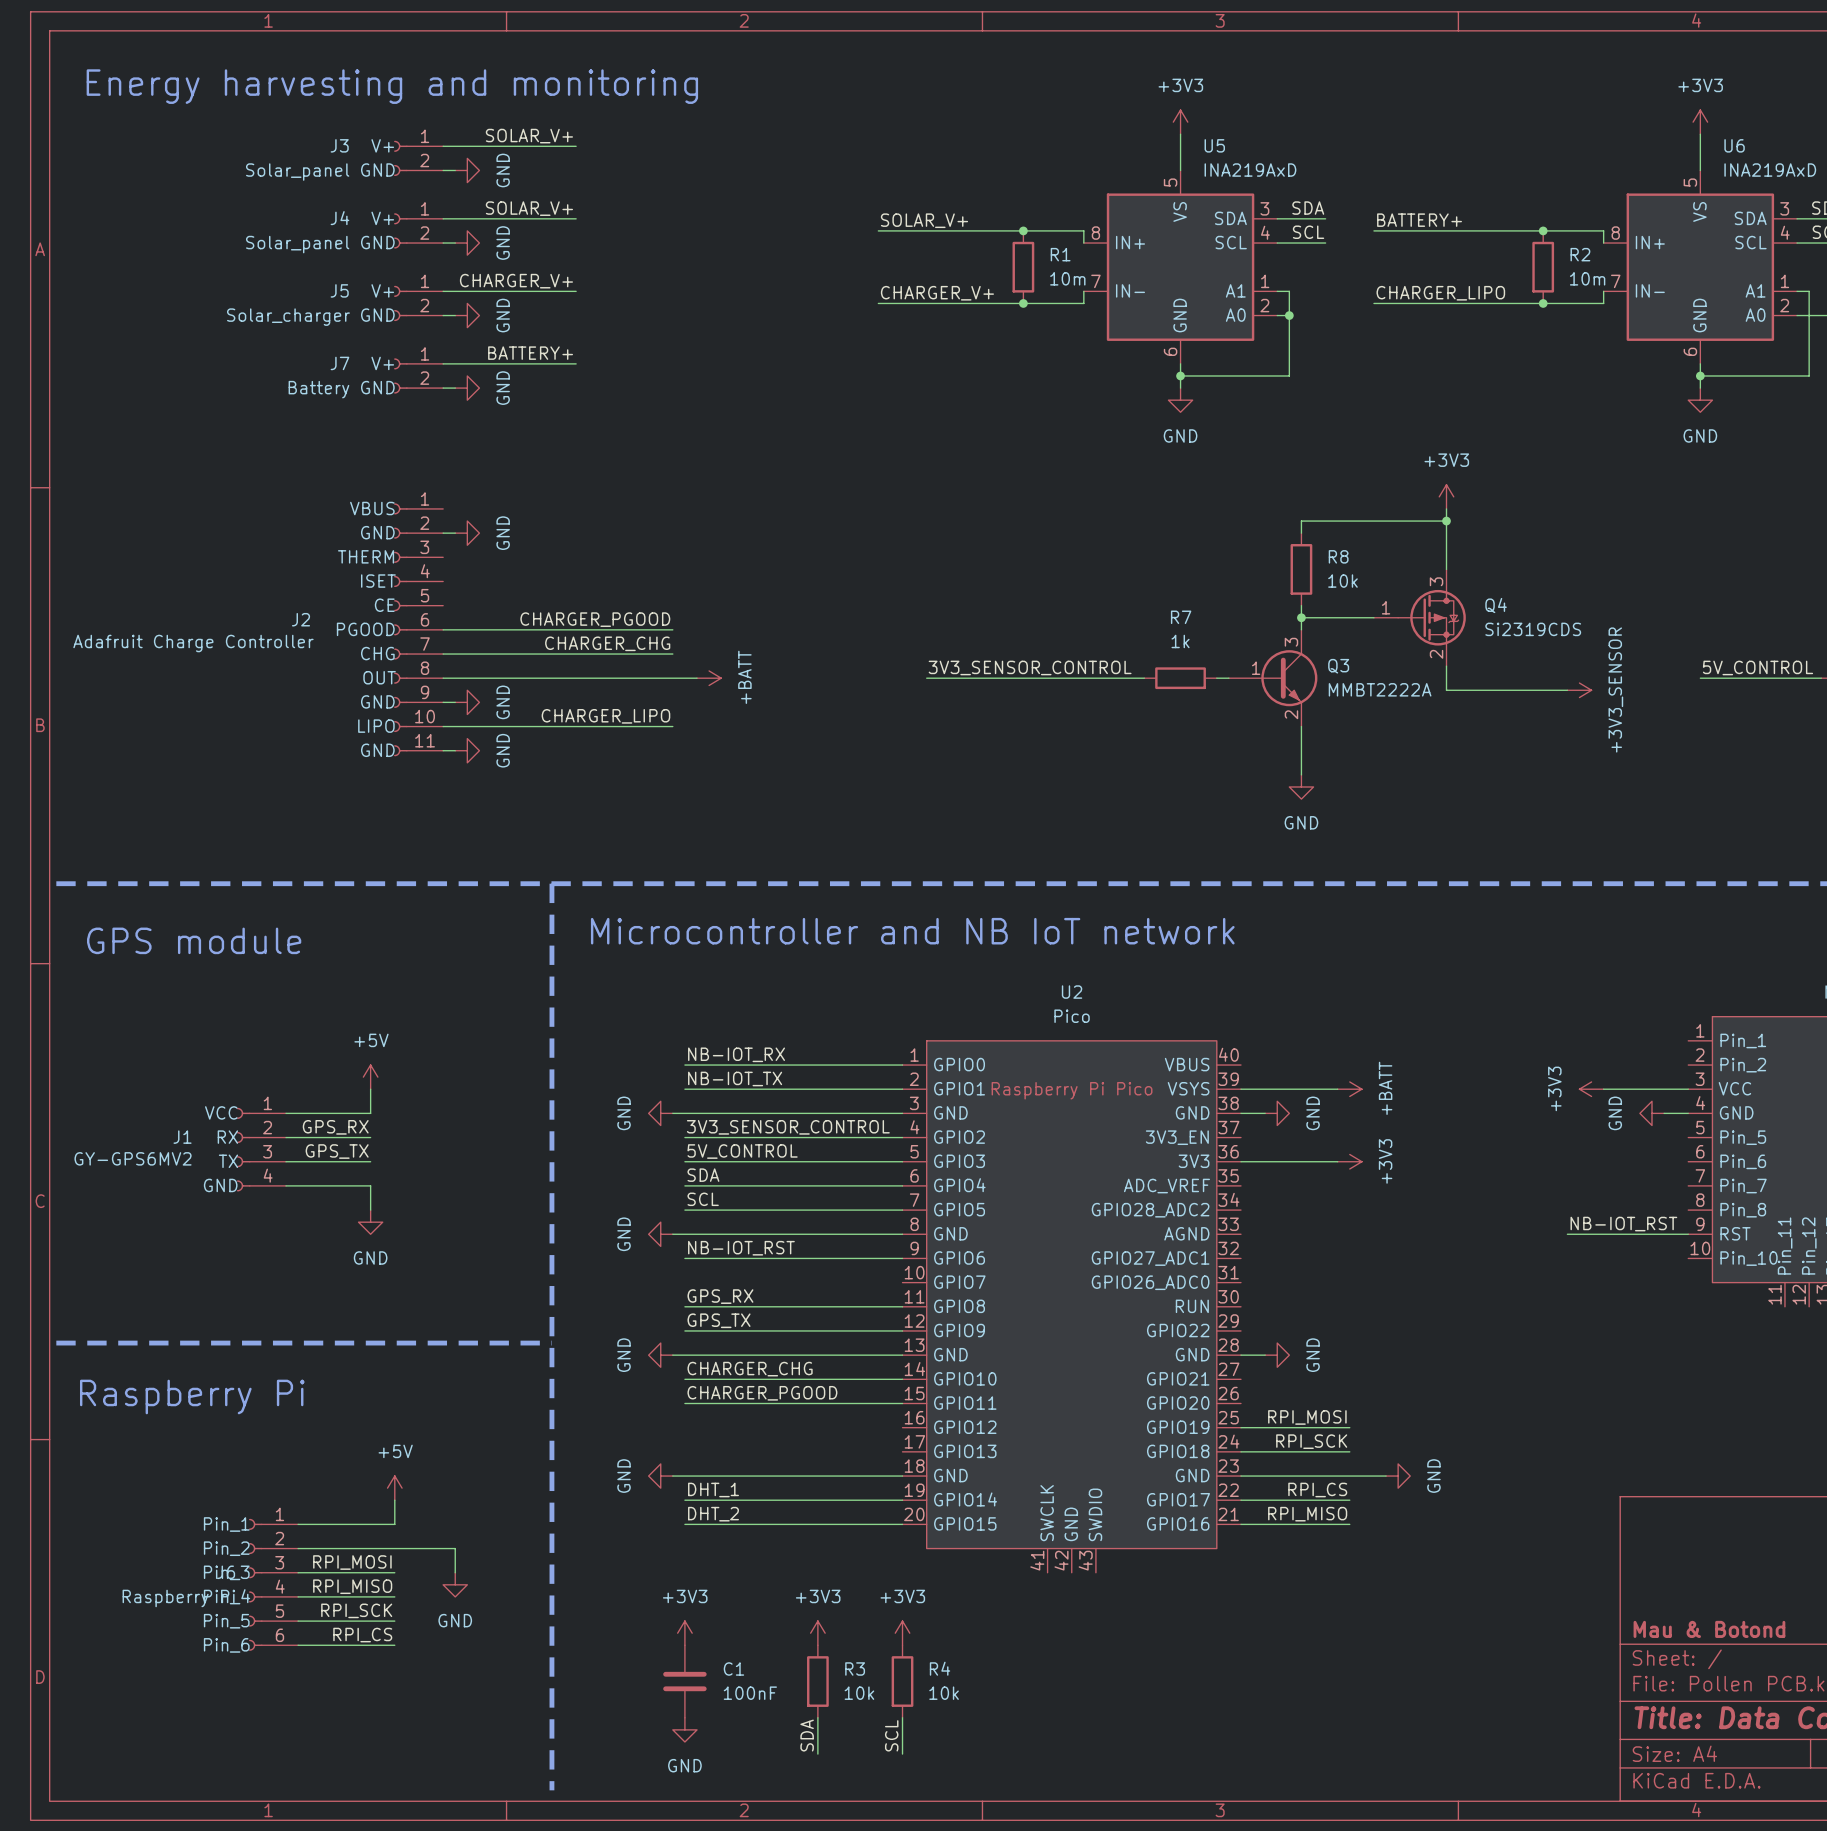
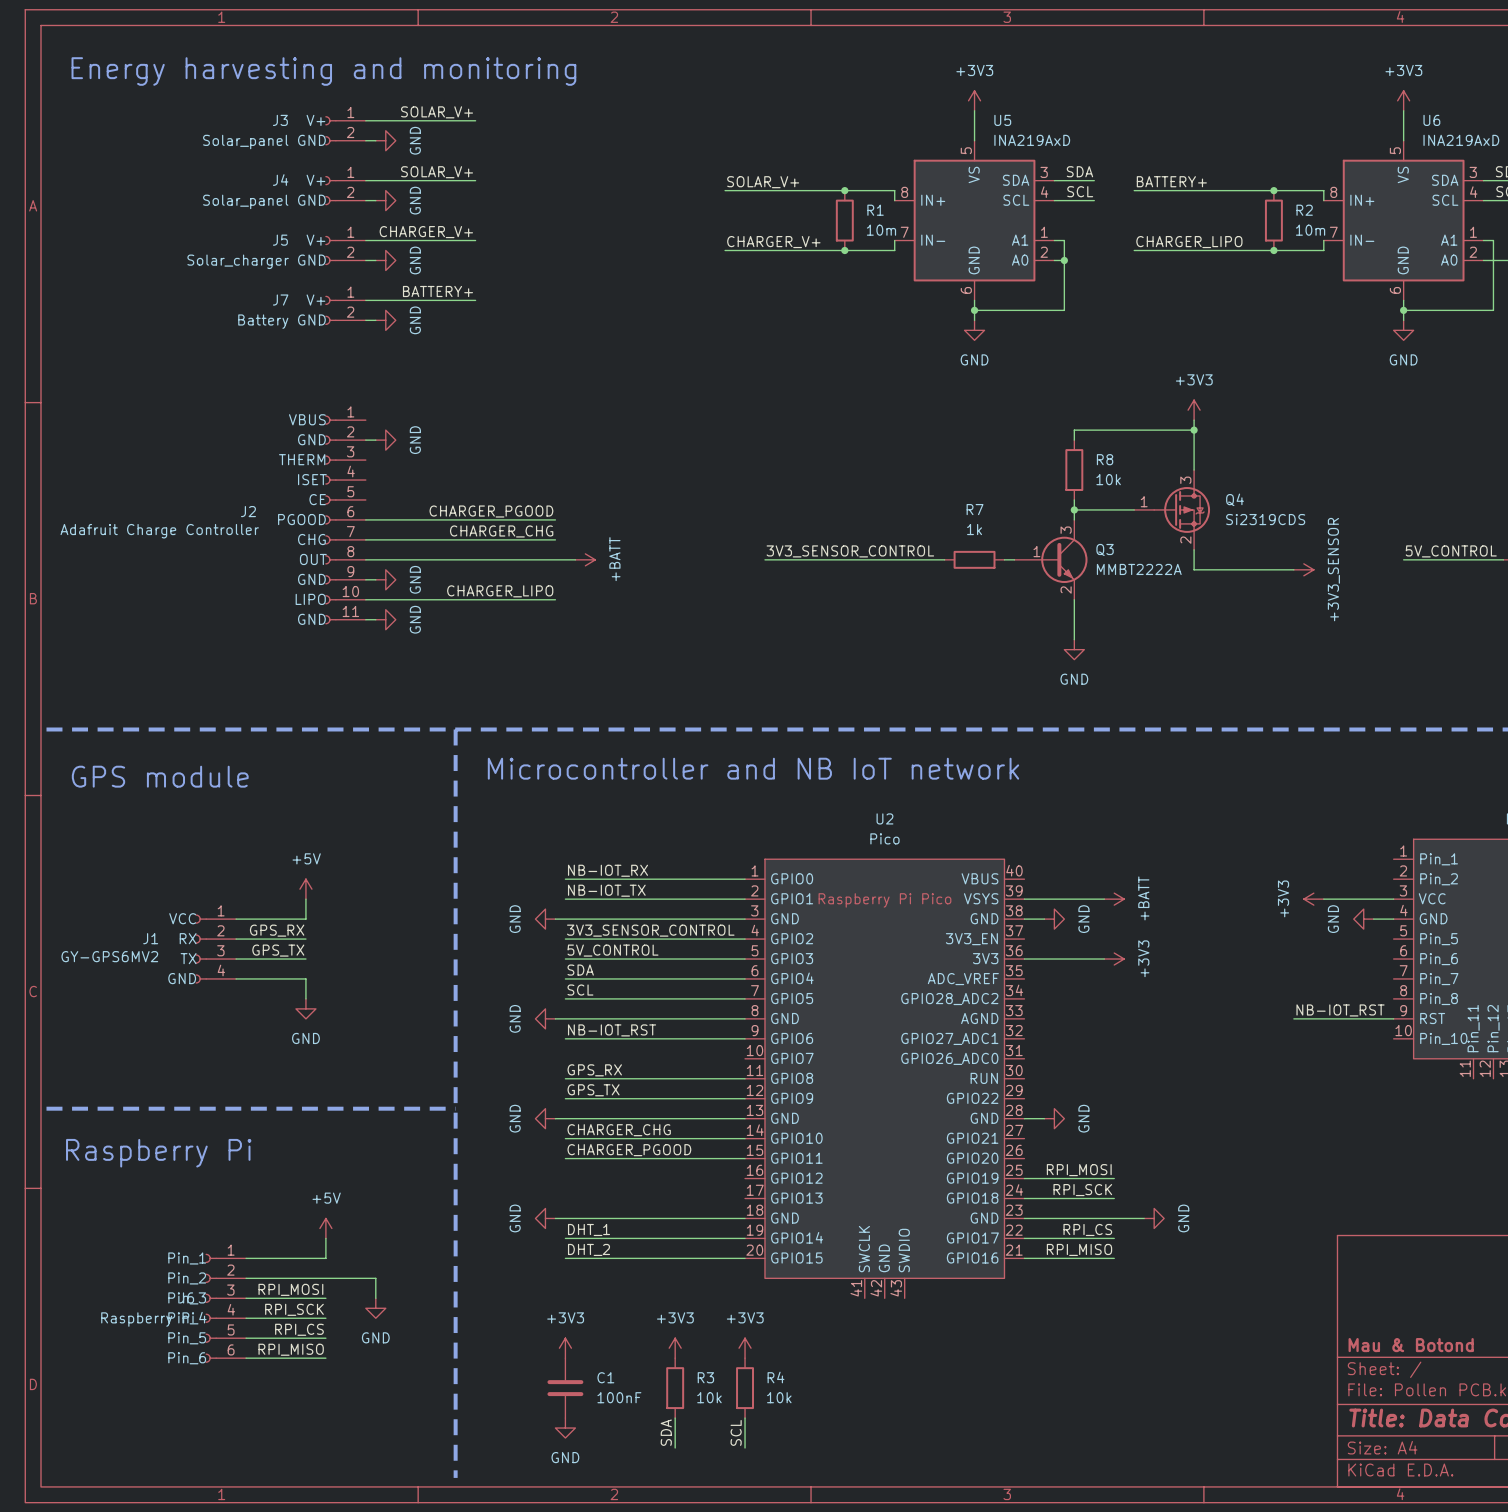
label: RPI_MISO (352, 1586) -> RPI_SCK (294, 1309)
label: RPI_SCK (356, 1610) -> RPI_CS (299, 1329)
label: RPI_CS (362, 1635) -> RPI_MISO (291, 1349)

